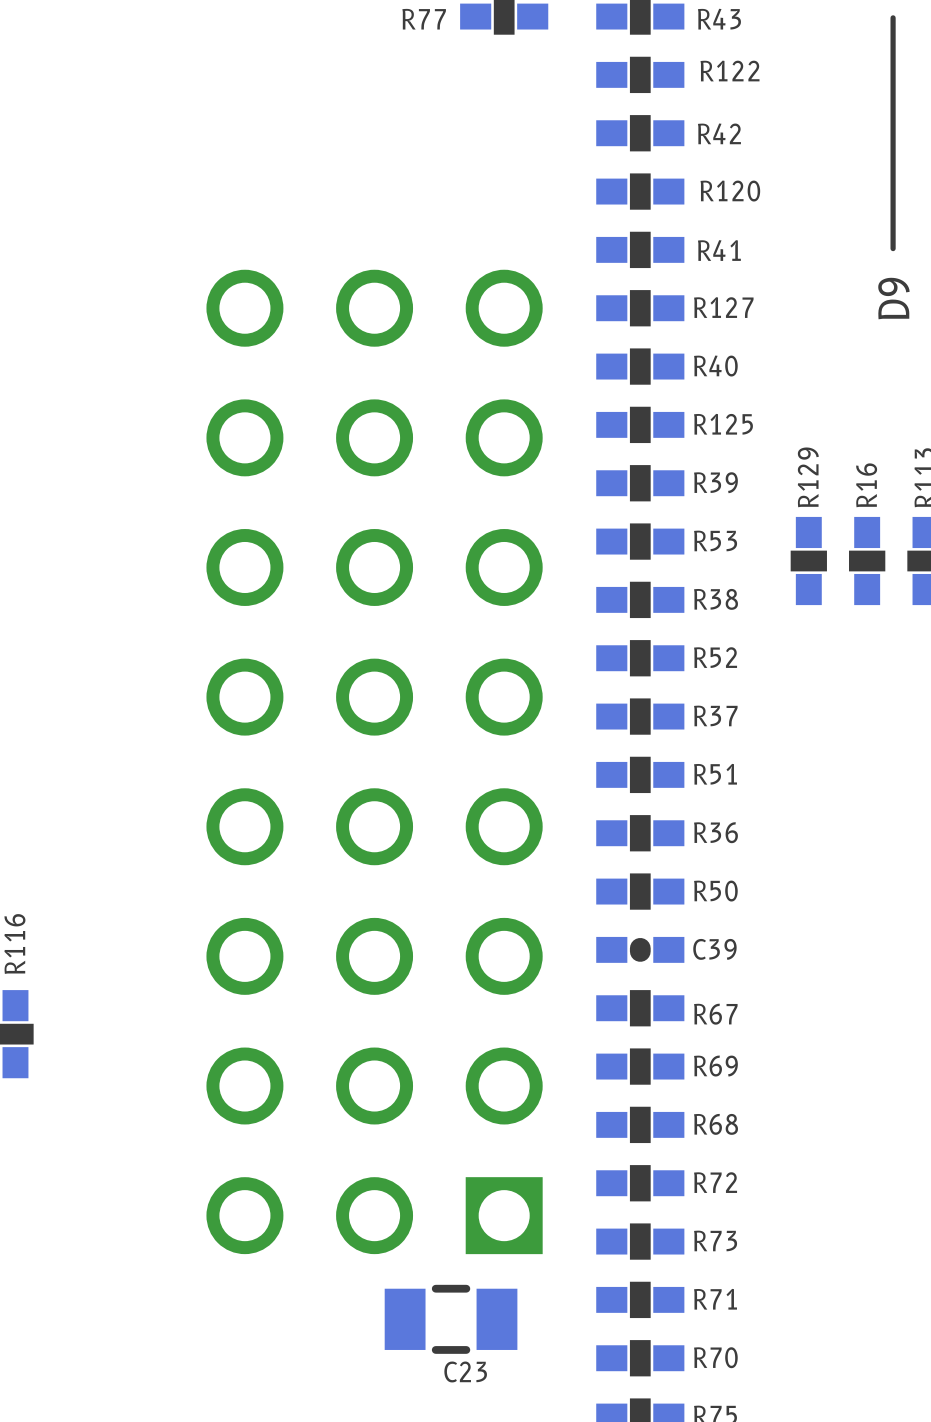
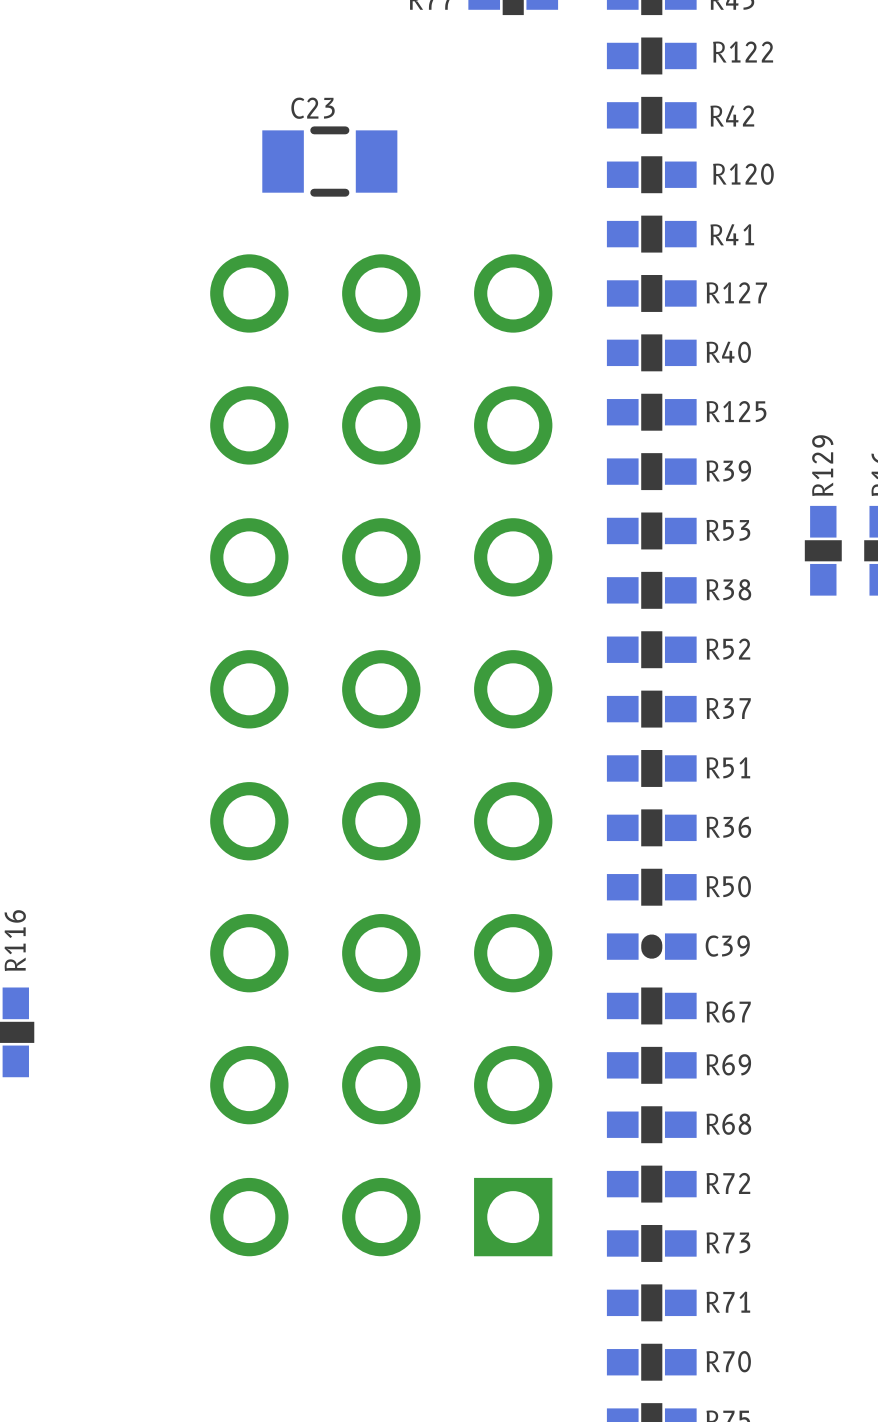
C23 position: (451, 1319) -> (329, 161)
C23 name position: C23 (465, 1371) -> C23 (313, 108)

